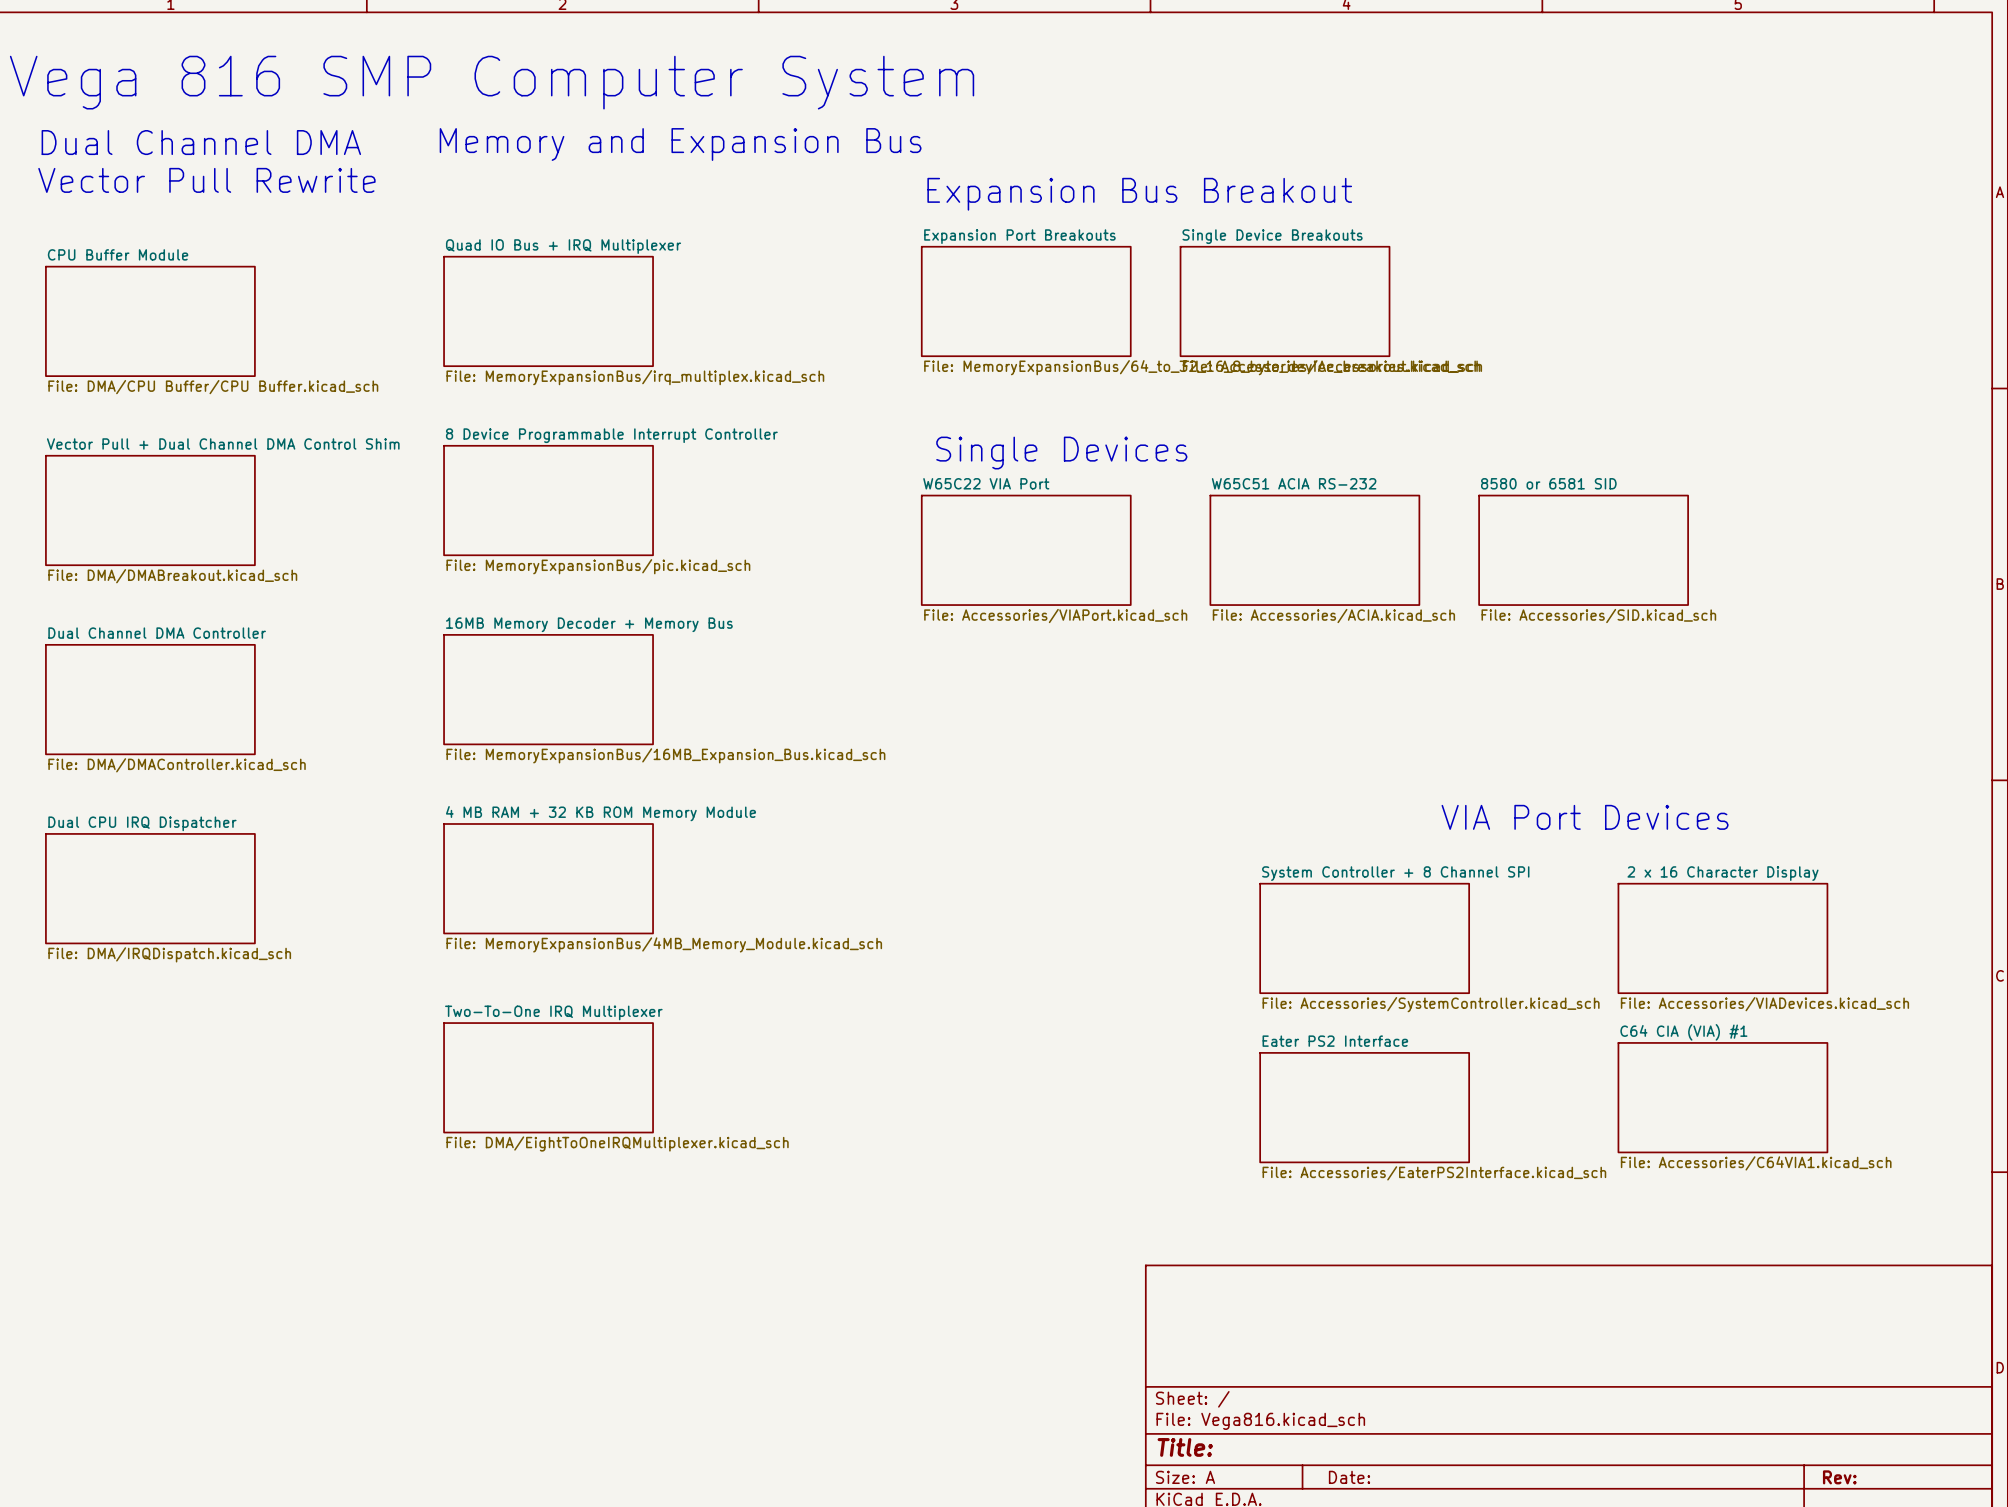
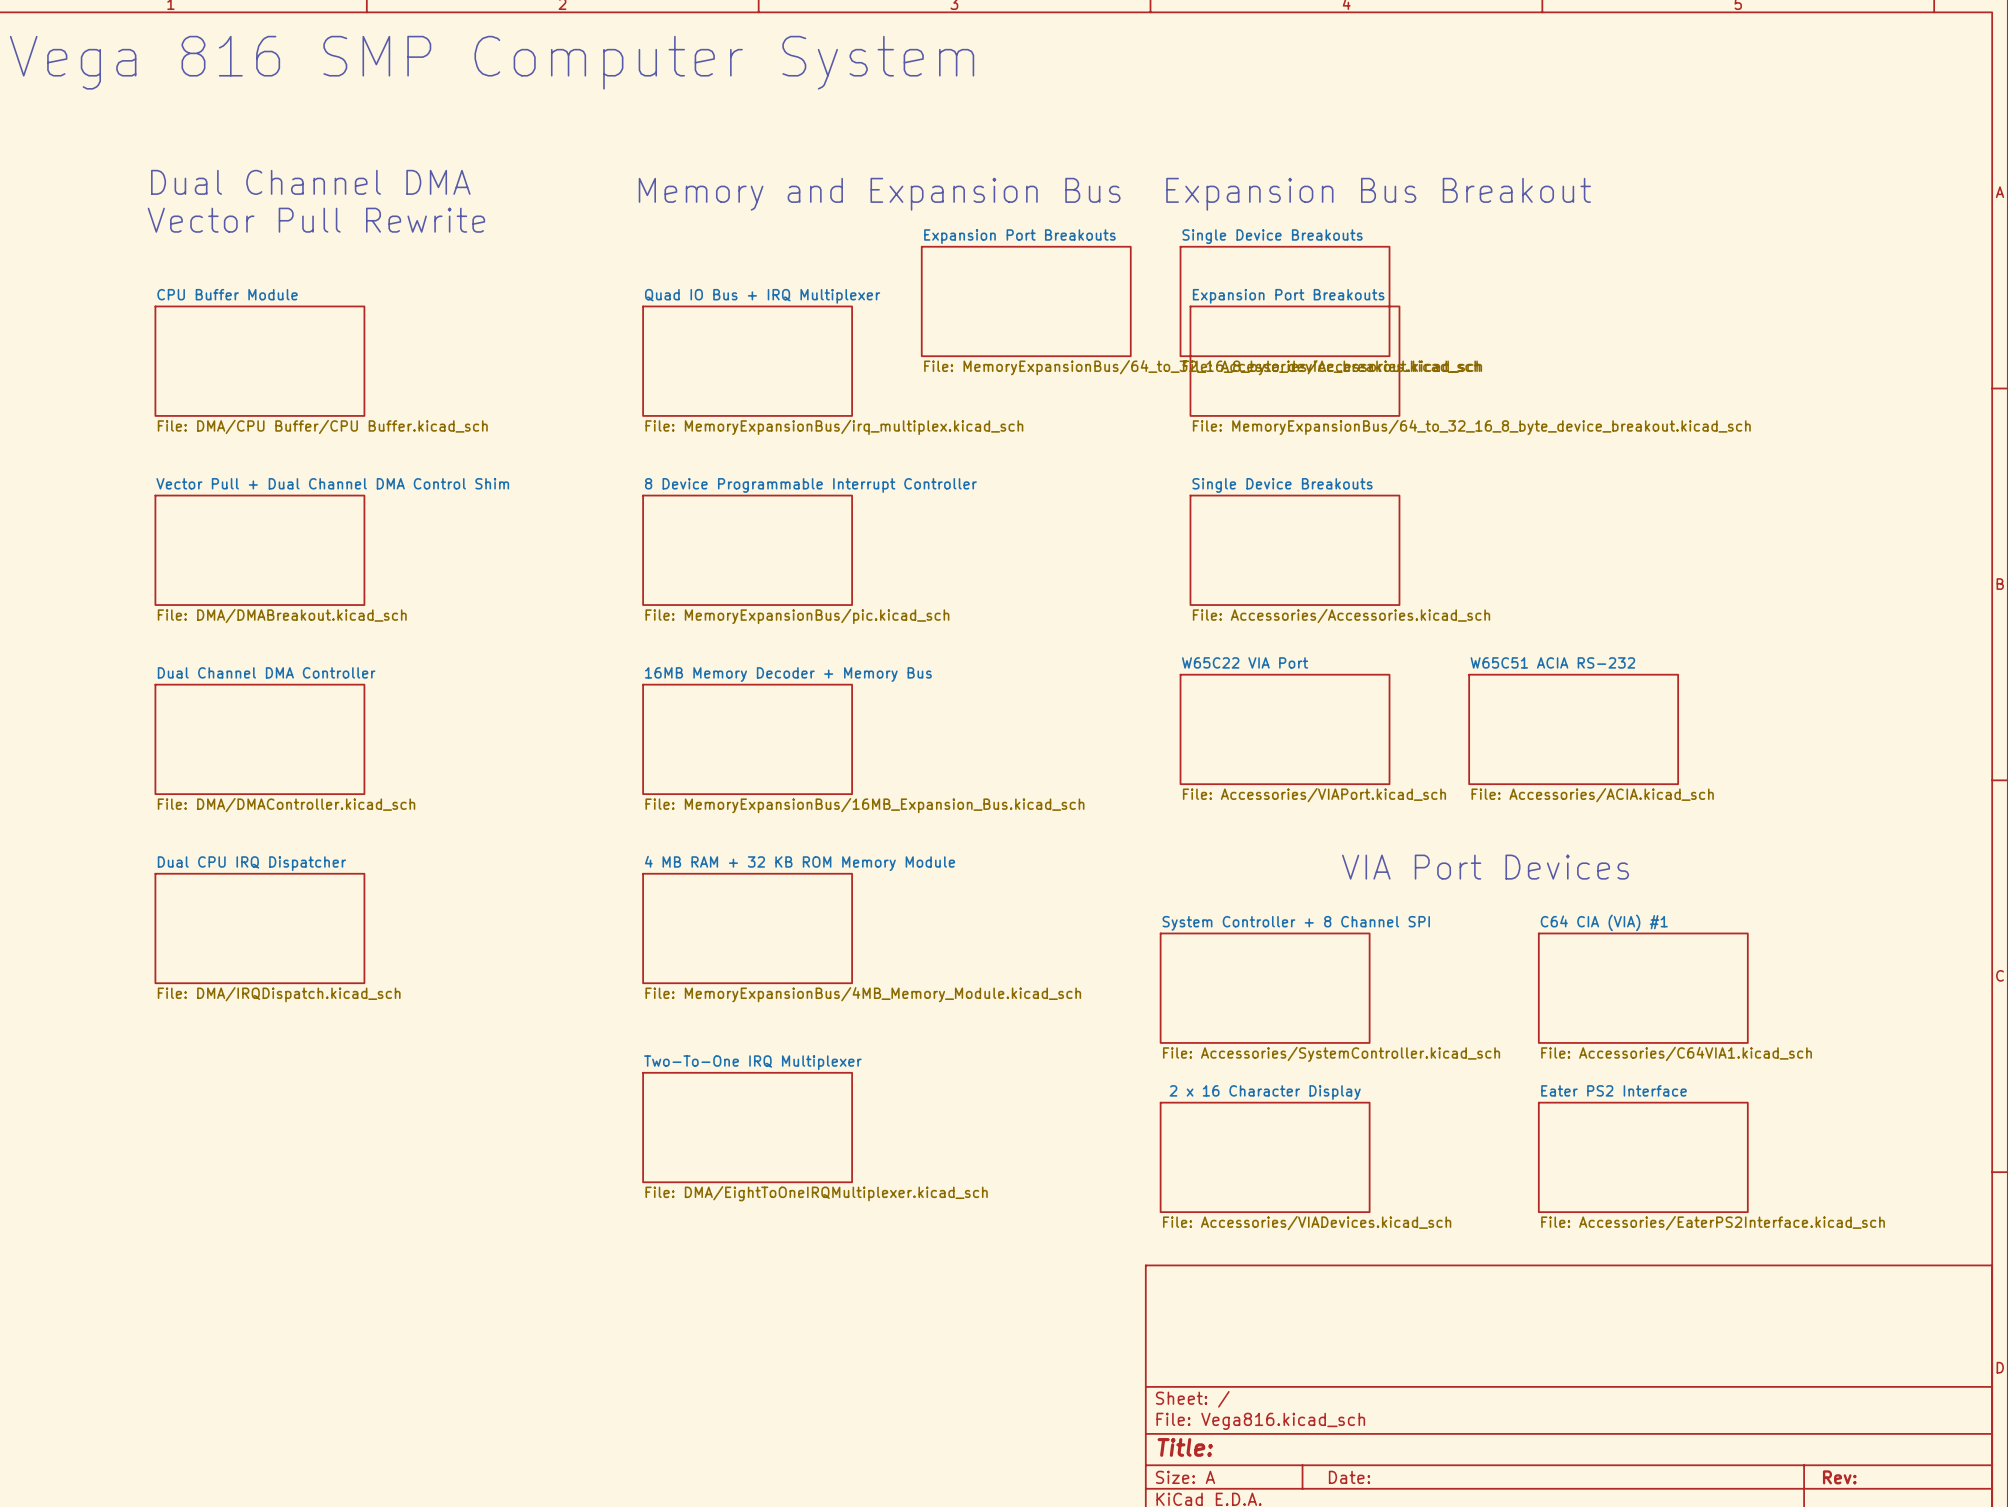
text position: Vega 816 SMP Computer System (492, 82) -> Vega 816 SMP Computer System (492, 62)
text position: Dual Channel DMA (201, 142) -> Dual Channel DMA (310, 182)
text: Memory and Expansion Bus (680, 144) -> none
text position: Vector Pull Rewrite (206, 180) -> Vector Pull Rewrite (316, 220)
text: none -> Memory and Expansion Bus (879, 194)
text: Expansion Bus Breakout (1139, 194) -> none
text: none -> Expansion Bus Breakout (1378, 194)
sheet Quad IO Bus + IRQ Multiplexer: File: MemoryExpansionBus/irq_multiplex.kicad_sch (548, 311) -> none
sheet CPU Buffer Module position: (150, 321) -> (259, 361)
sheet Quad IO Bus + IRQ Multiplexer: none -> File: MemoryExpansionBus/irq_multiplex.kicad_sch (747, 361)
sheet Expansion Port Breakouts: none -> File: MemoryExpansionBus/64_to_32_16_8_byte_device_breakout.kicad_sch (1294, 361)
text: Single Devices (1061, 453) -> none
sheet 8 Device Programmable Interrupt Controller position: (548, 500) -> (747, 550)
sheet Vector Pull + Dual Channel DMA Control Shim position: (150, 510) -> (259, 550)
sheet W65C22 VIA Port position: (1026, 550) -> (1285, 729)
sheet Single Device Breakouts: none -> File: Accessories/Accessories.kicad_sch (1294, 550)
sheet W65C51 ACIA RS-232 position: (1314, 550) -> (1573, 729)
sheet 8580 or 6581 SID: File: Accessories/SID.kicad_sch (1583, 550) -> none
sheet 16MB Memory Decoder + Memory Bus position: (548, 689) -> (747, 739)
sheet Dual Channel DMA Controller position: (150, 699) -> (259, 739)
text position: VIA Port Devices (1585, 817) -> VIA Port Devices (1485, 867)
sheet 4 MB RAM + 32 KB ROM Memory Module position: (548, 878) -> (747, 928)
sheet Dual CPU IRQ Dispatcher position: (150, 888) -> (259, 928)
sheet System Controller + 8 Channel SPI position: (1364, 938) -> (1265, 988)
sheet 2 x 16 Character Display position: (1722, 938) -> (1265, 1157)
sheet Two-To-One IRQ Multiplexer: File: DMA/EightToOneIRQMultiplexer.kicad_sch (548, 1077) -> none
sheet C64 CIA (VIA) #1 position: (1722, 1097) -> (1643, 988)
sheet Eater PS2 Interface position: (1364, 1107) -> (1643, 1157)
sheet Two-To-One IRQ Multiplexer: none -> File: DMA/EightToOneIRQMultiplexer.kicad_sch (747, 1127)

